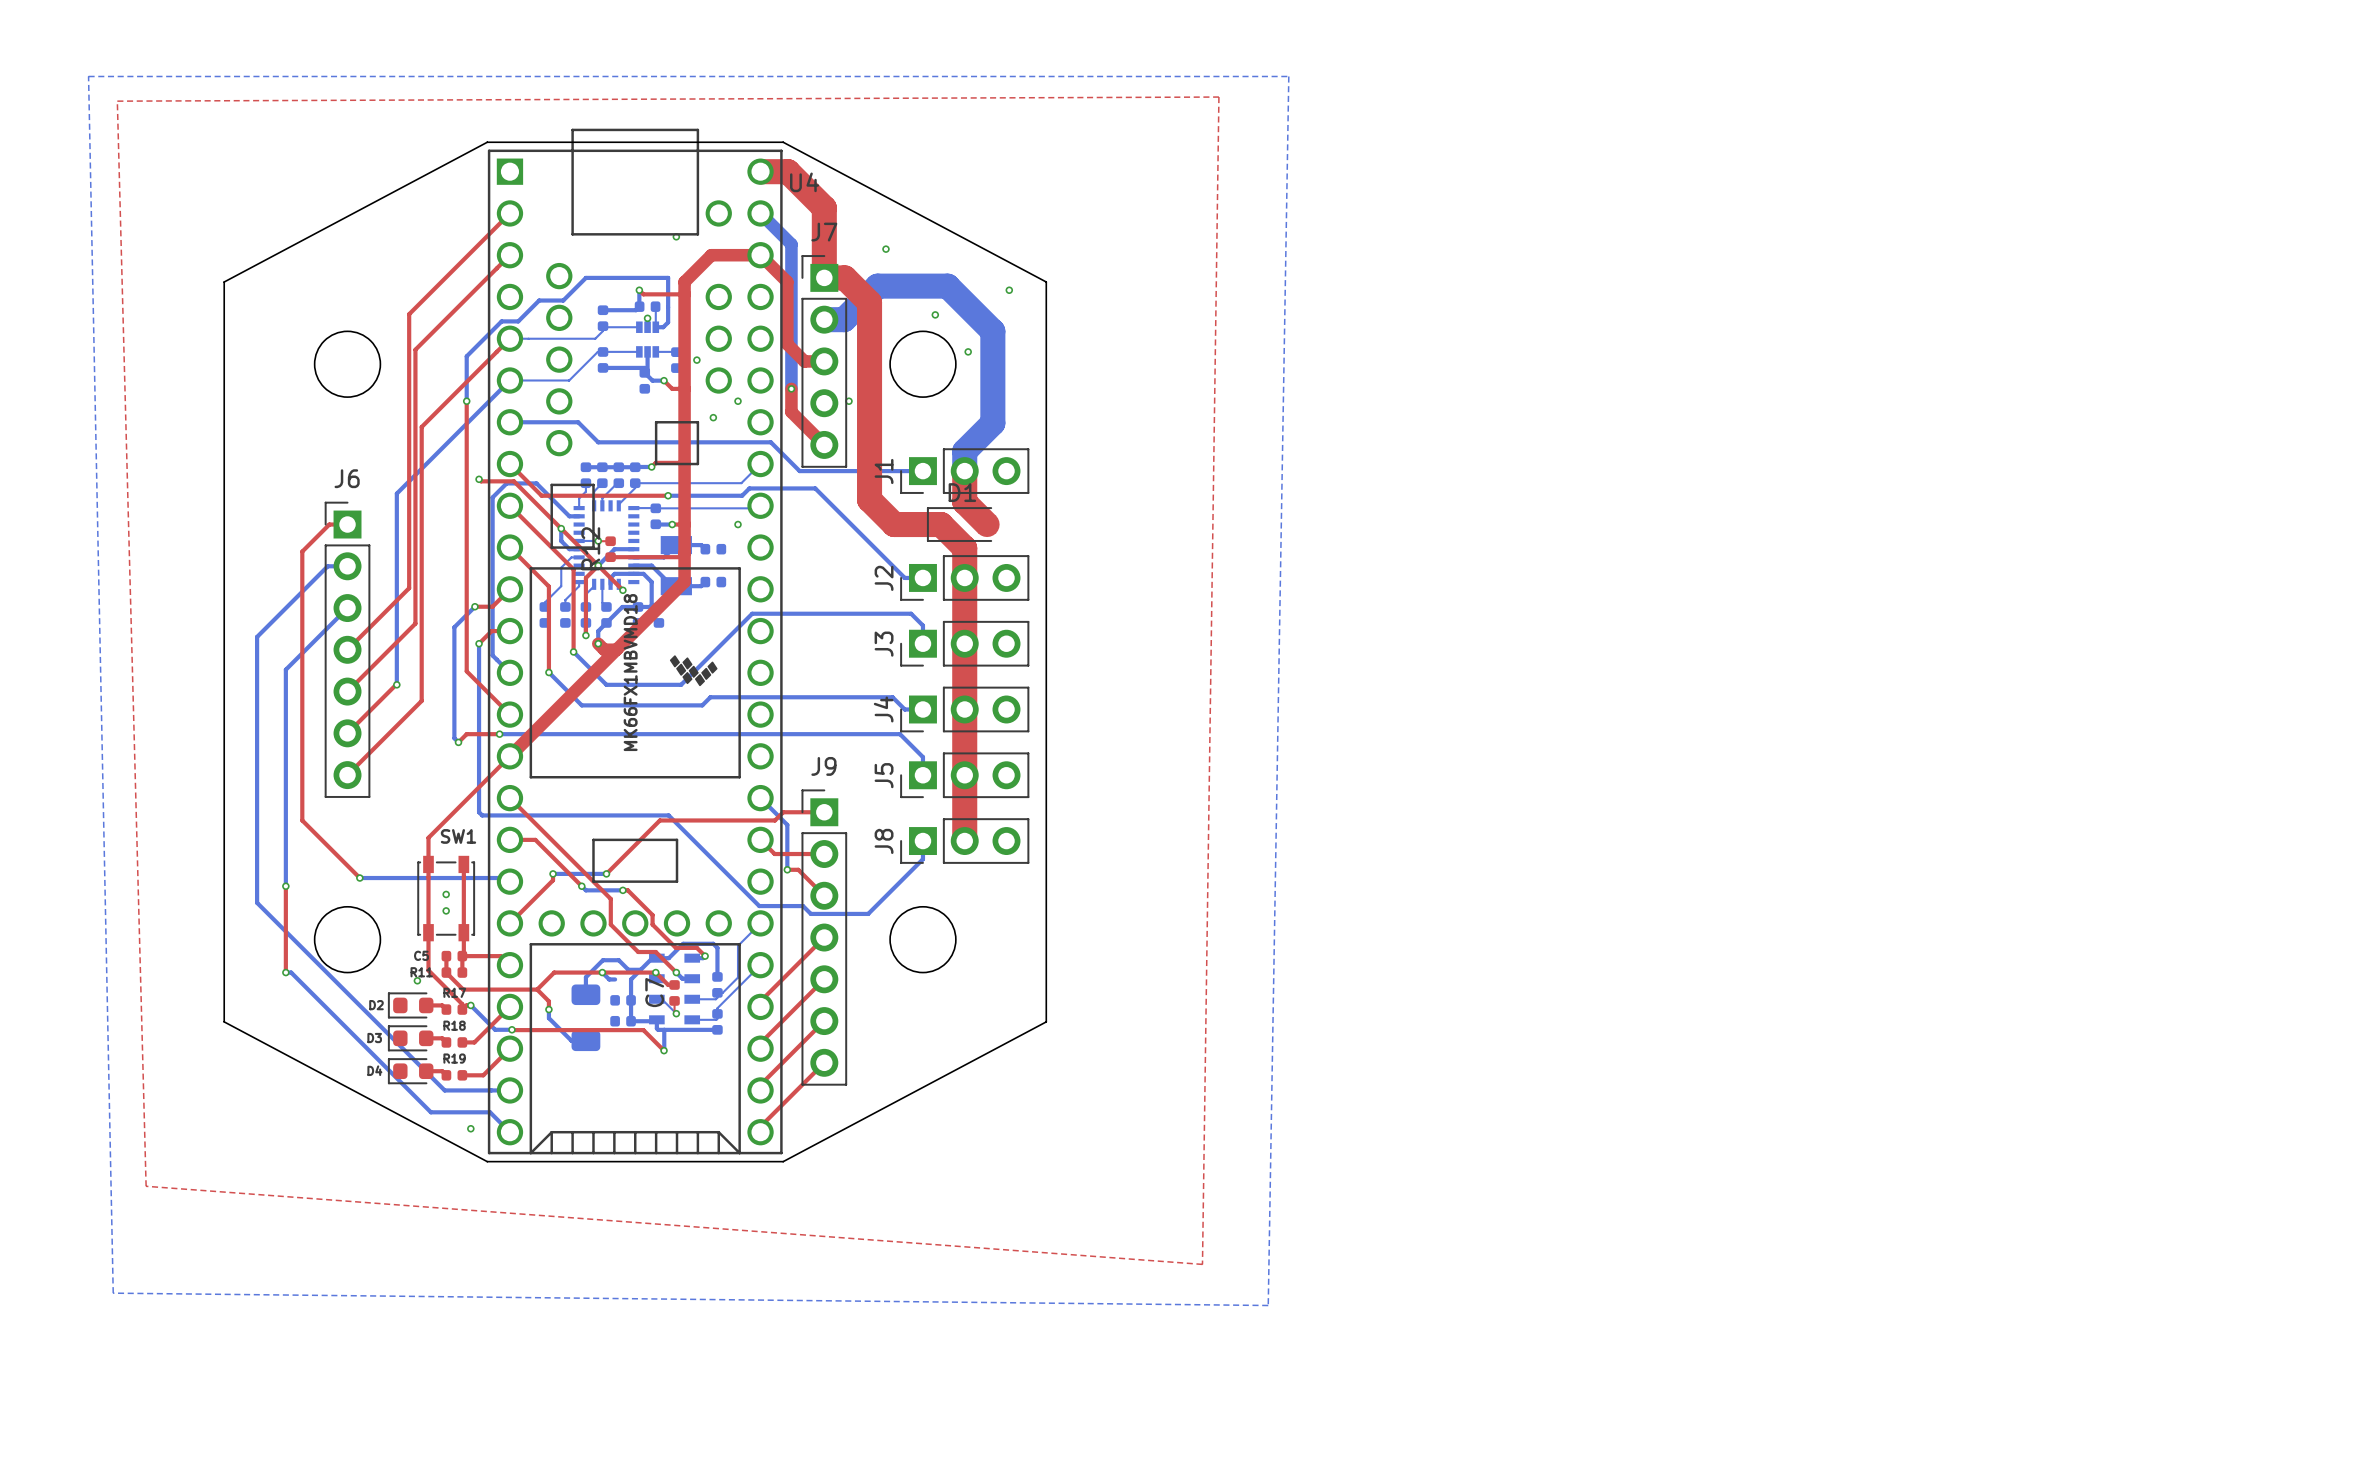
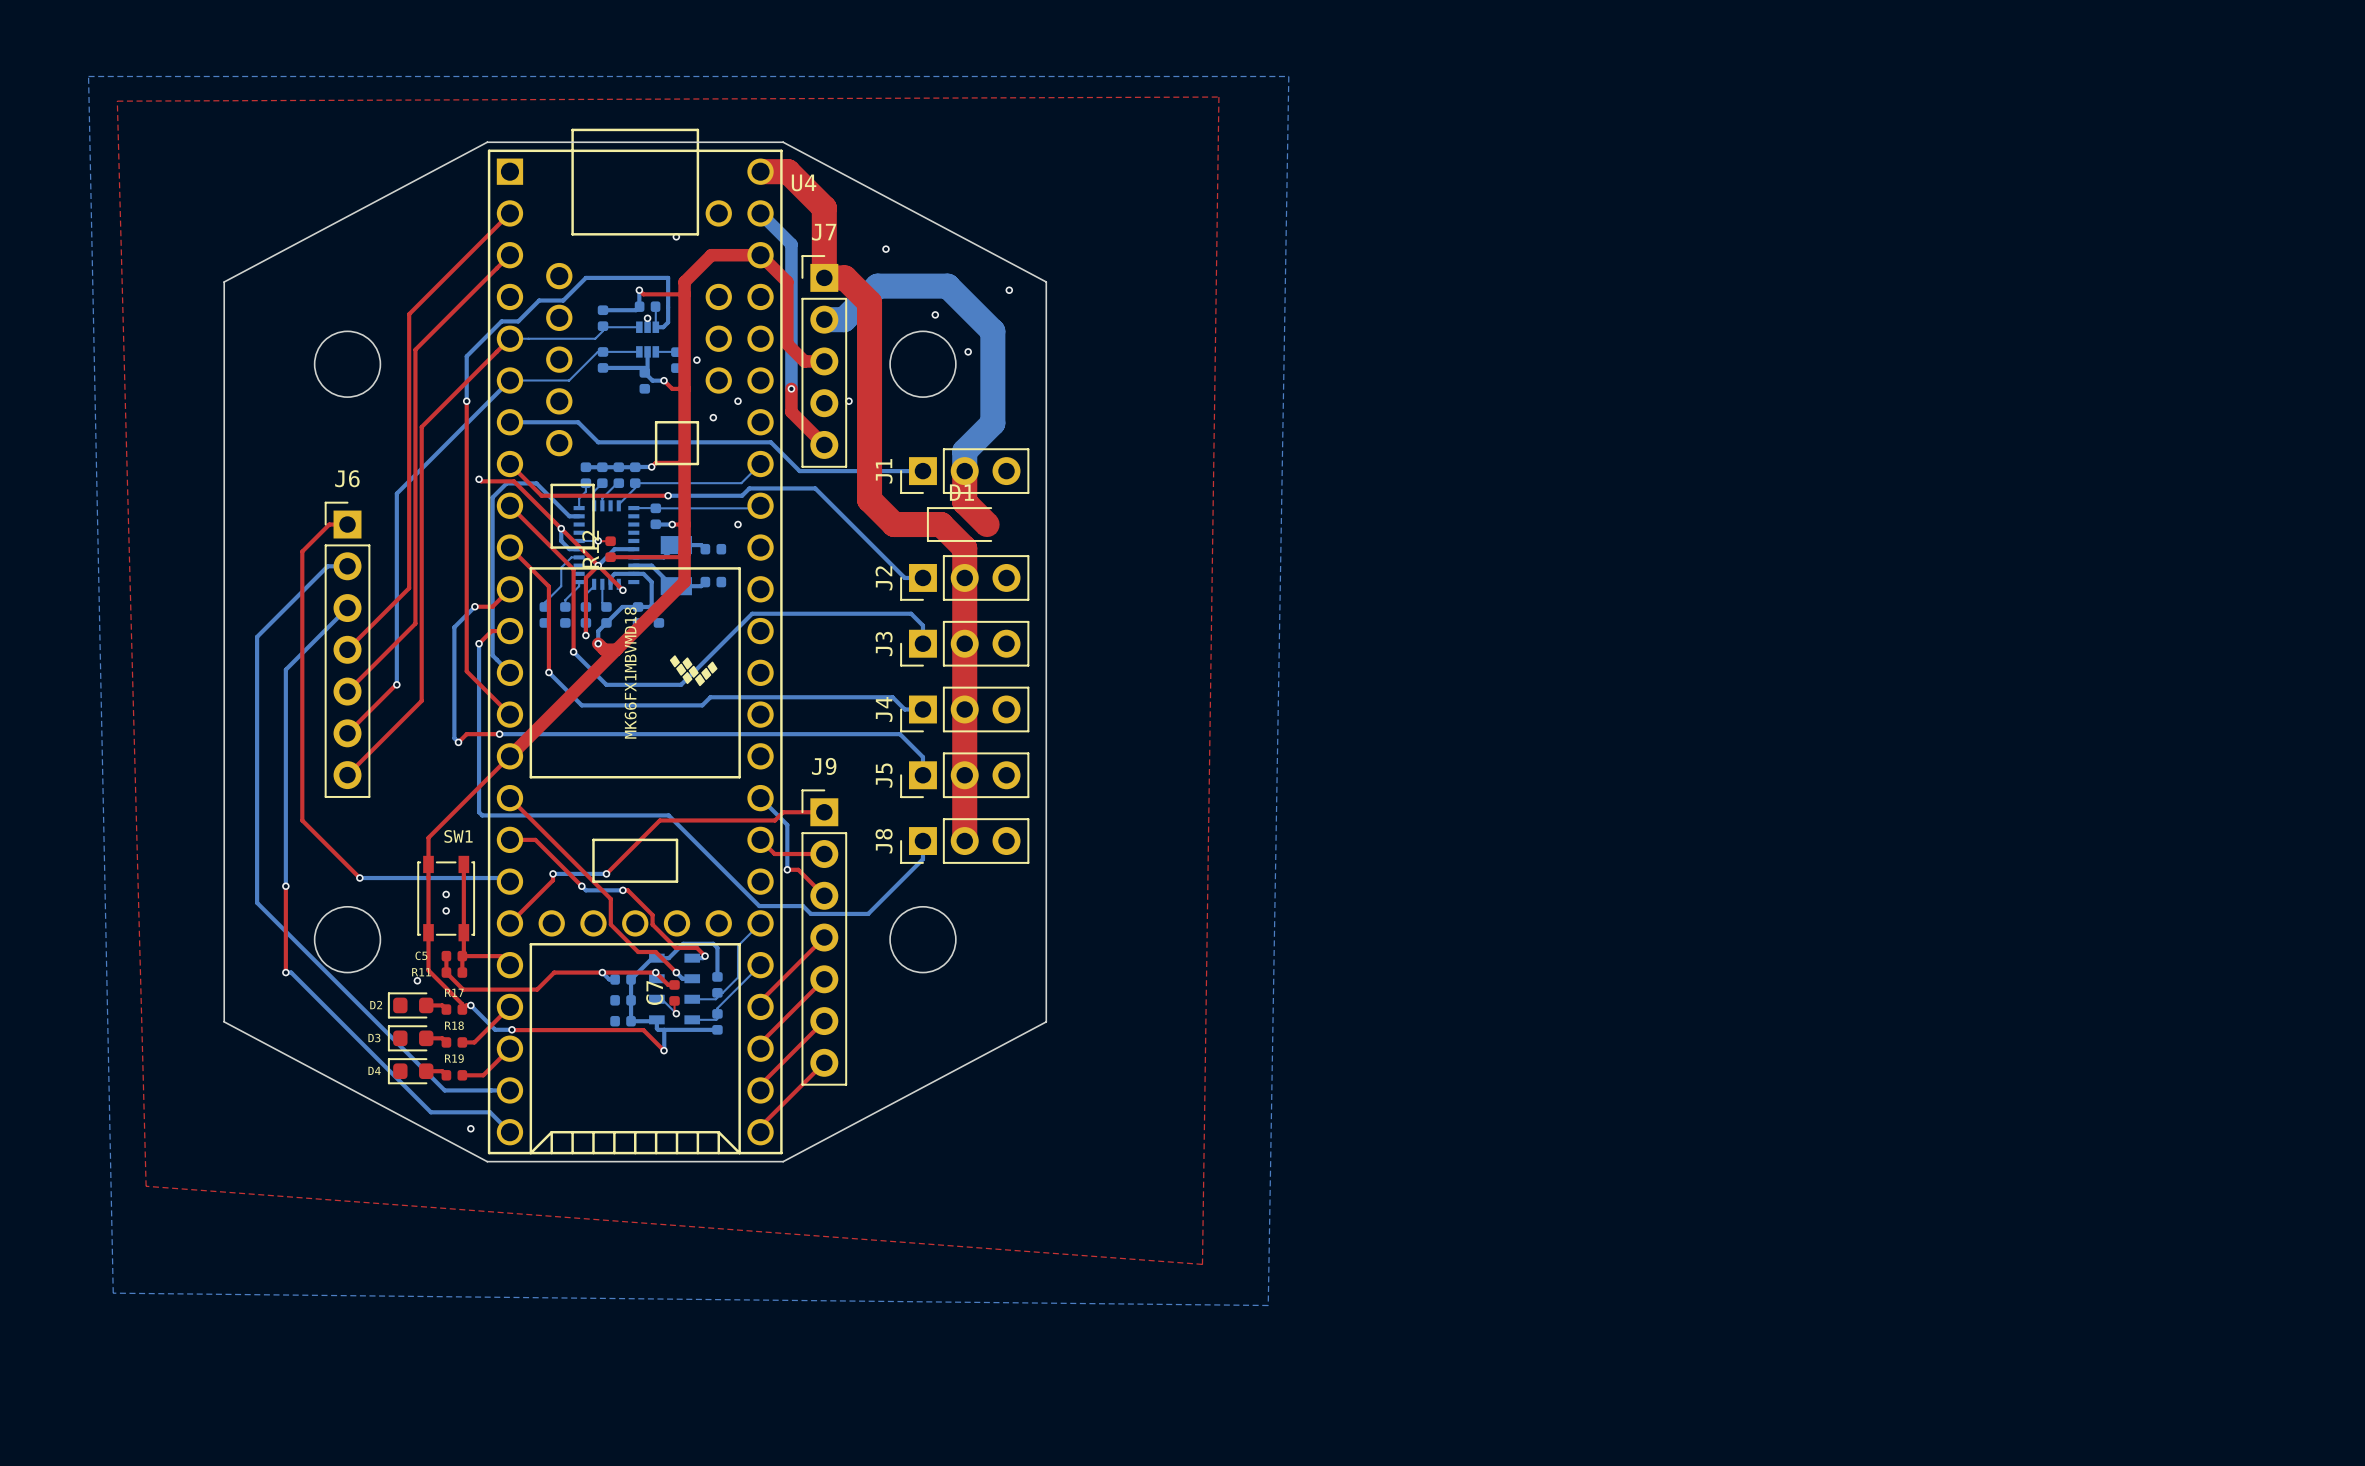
bottom track: (640, 969) (628, 969) (618, 960) (602, 960) (585, 977) (585, 994) -> none
part: none -> (623, 979)
top track: (537, 989) (548, 1001) (548, 1009) -> none
bottom track: (548, 1009) (548, 1018) (571, 1040) (585, 1040) -> none
via: (548, 1009) -> none
part: (585, 1017) -> none

